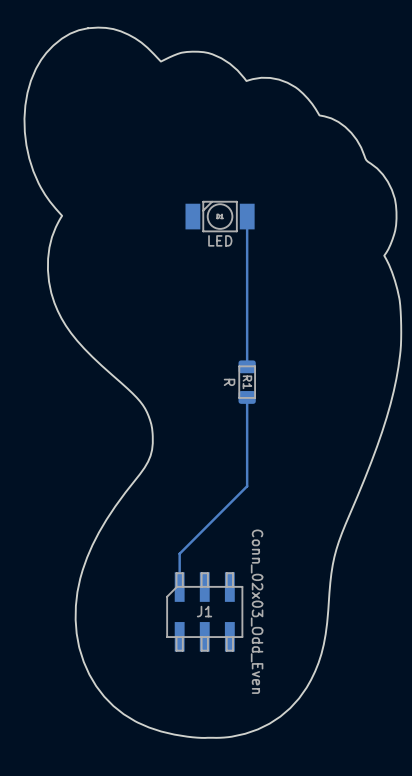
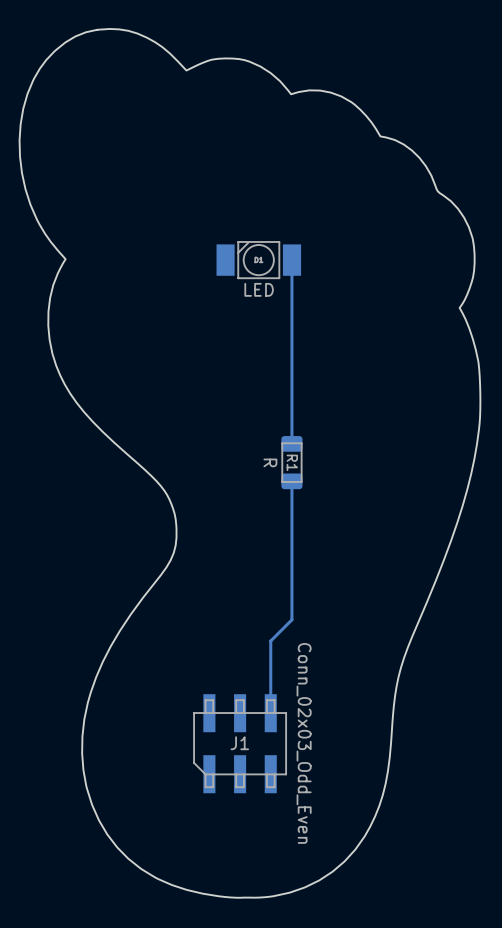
track: (247, 486) (179, 553) (179, 587) -> (291, 589) (291, 619) (270, 641) (270, 713)
J1 footprint: [166, 572, 243, 652] -> [193, 694, 287, 794]

